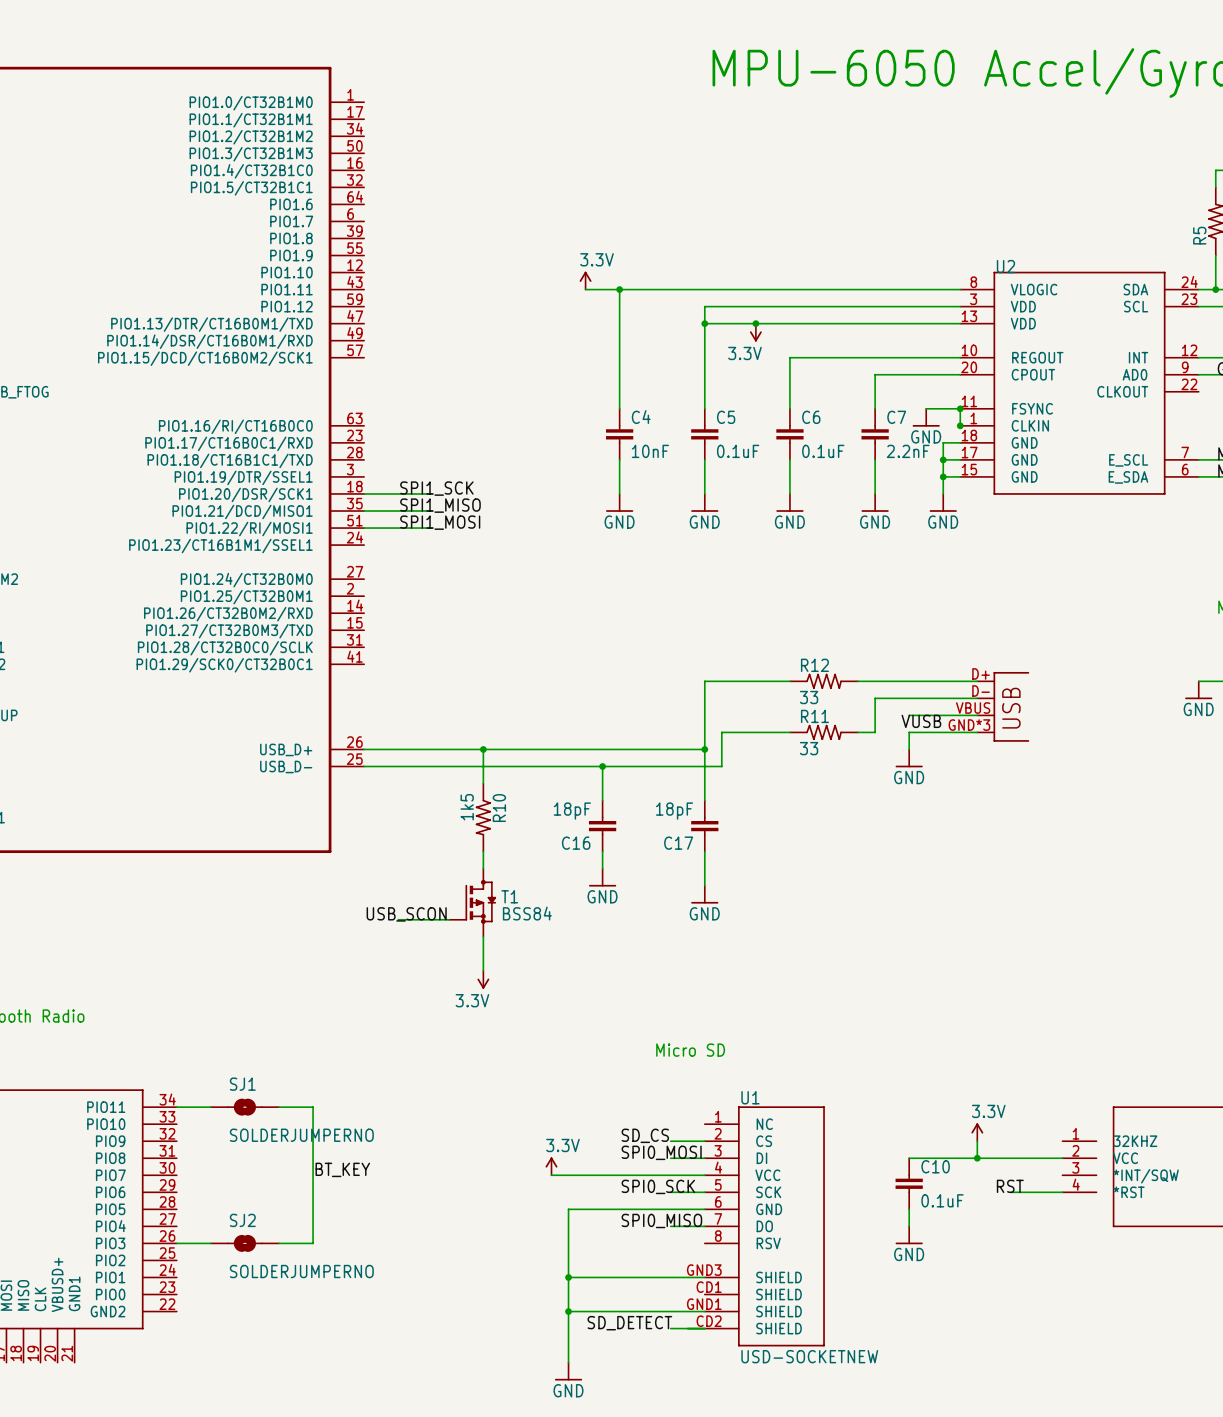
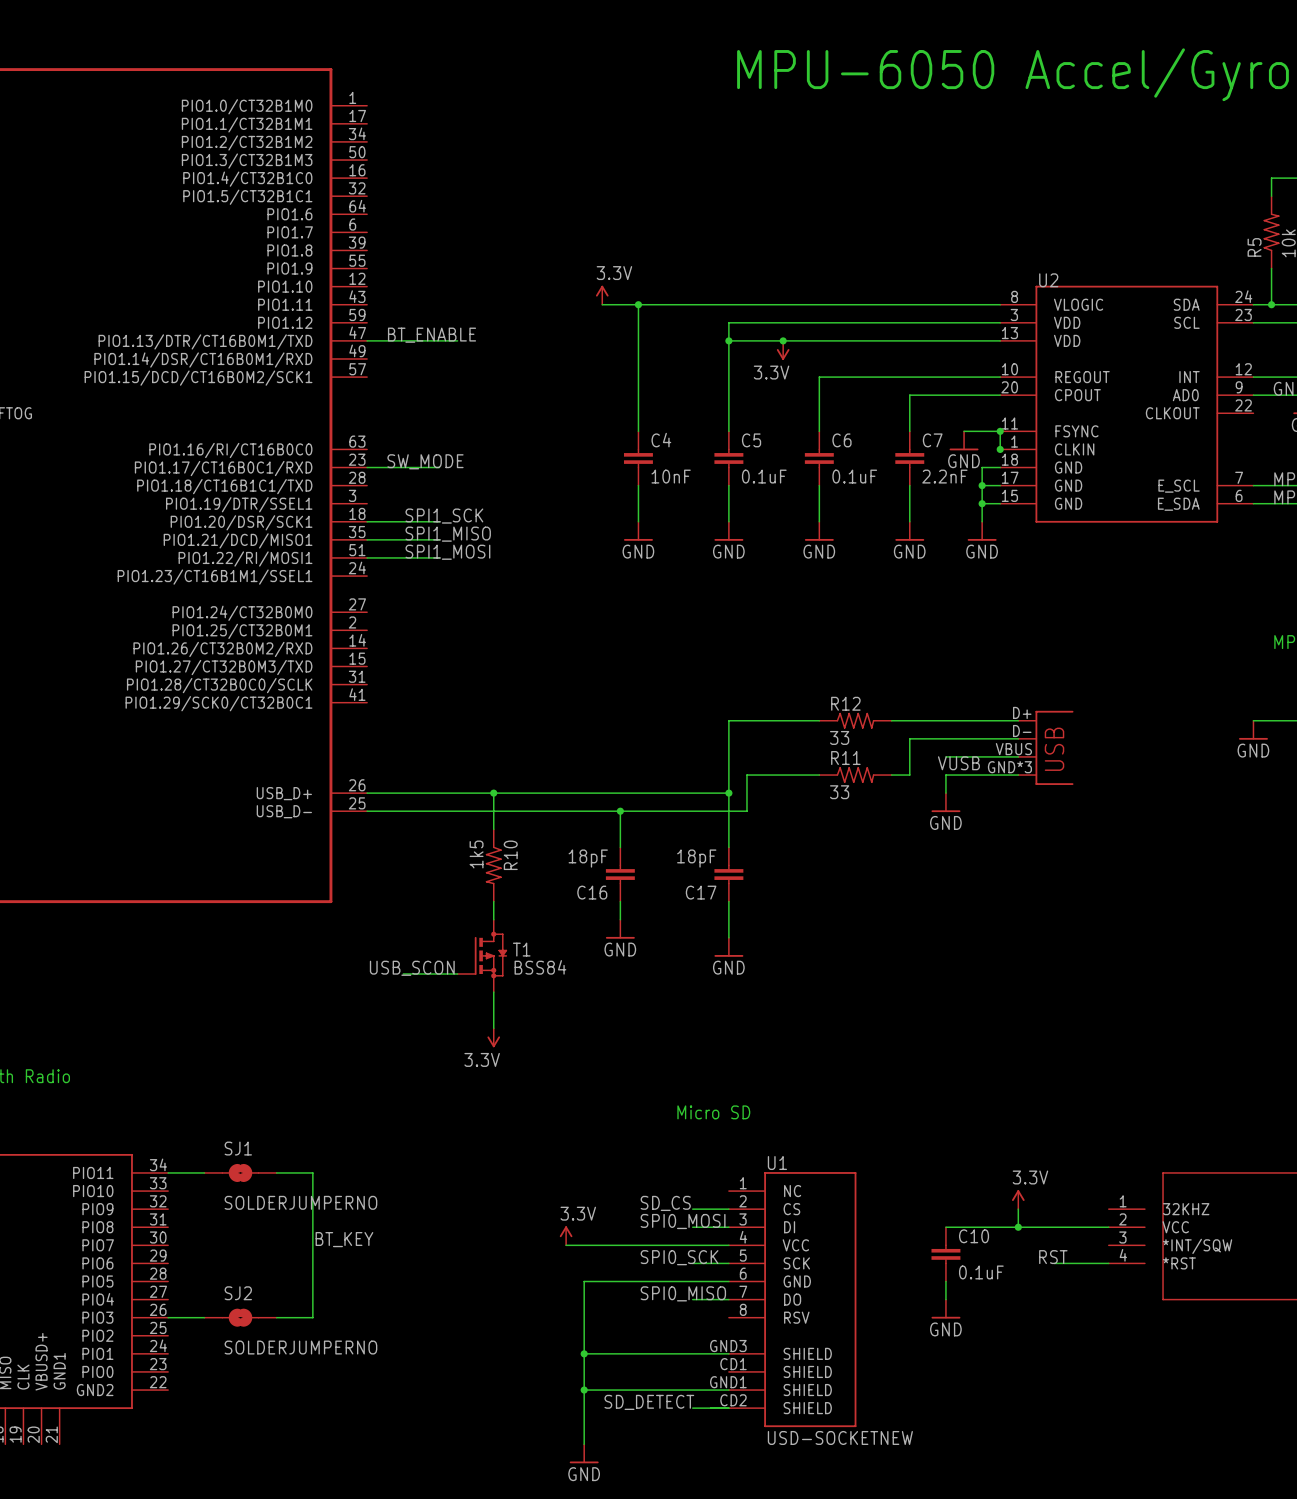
label: none -> BT_ENABLE (432, 335)
wire: none -> (367, 340) (457, 340)
label: none -> SW_MODE (425, 461)
wire: none -> (367, 467) (439, 467)

